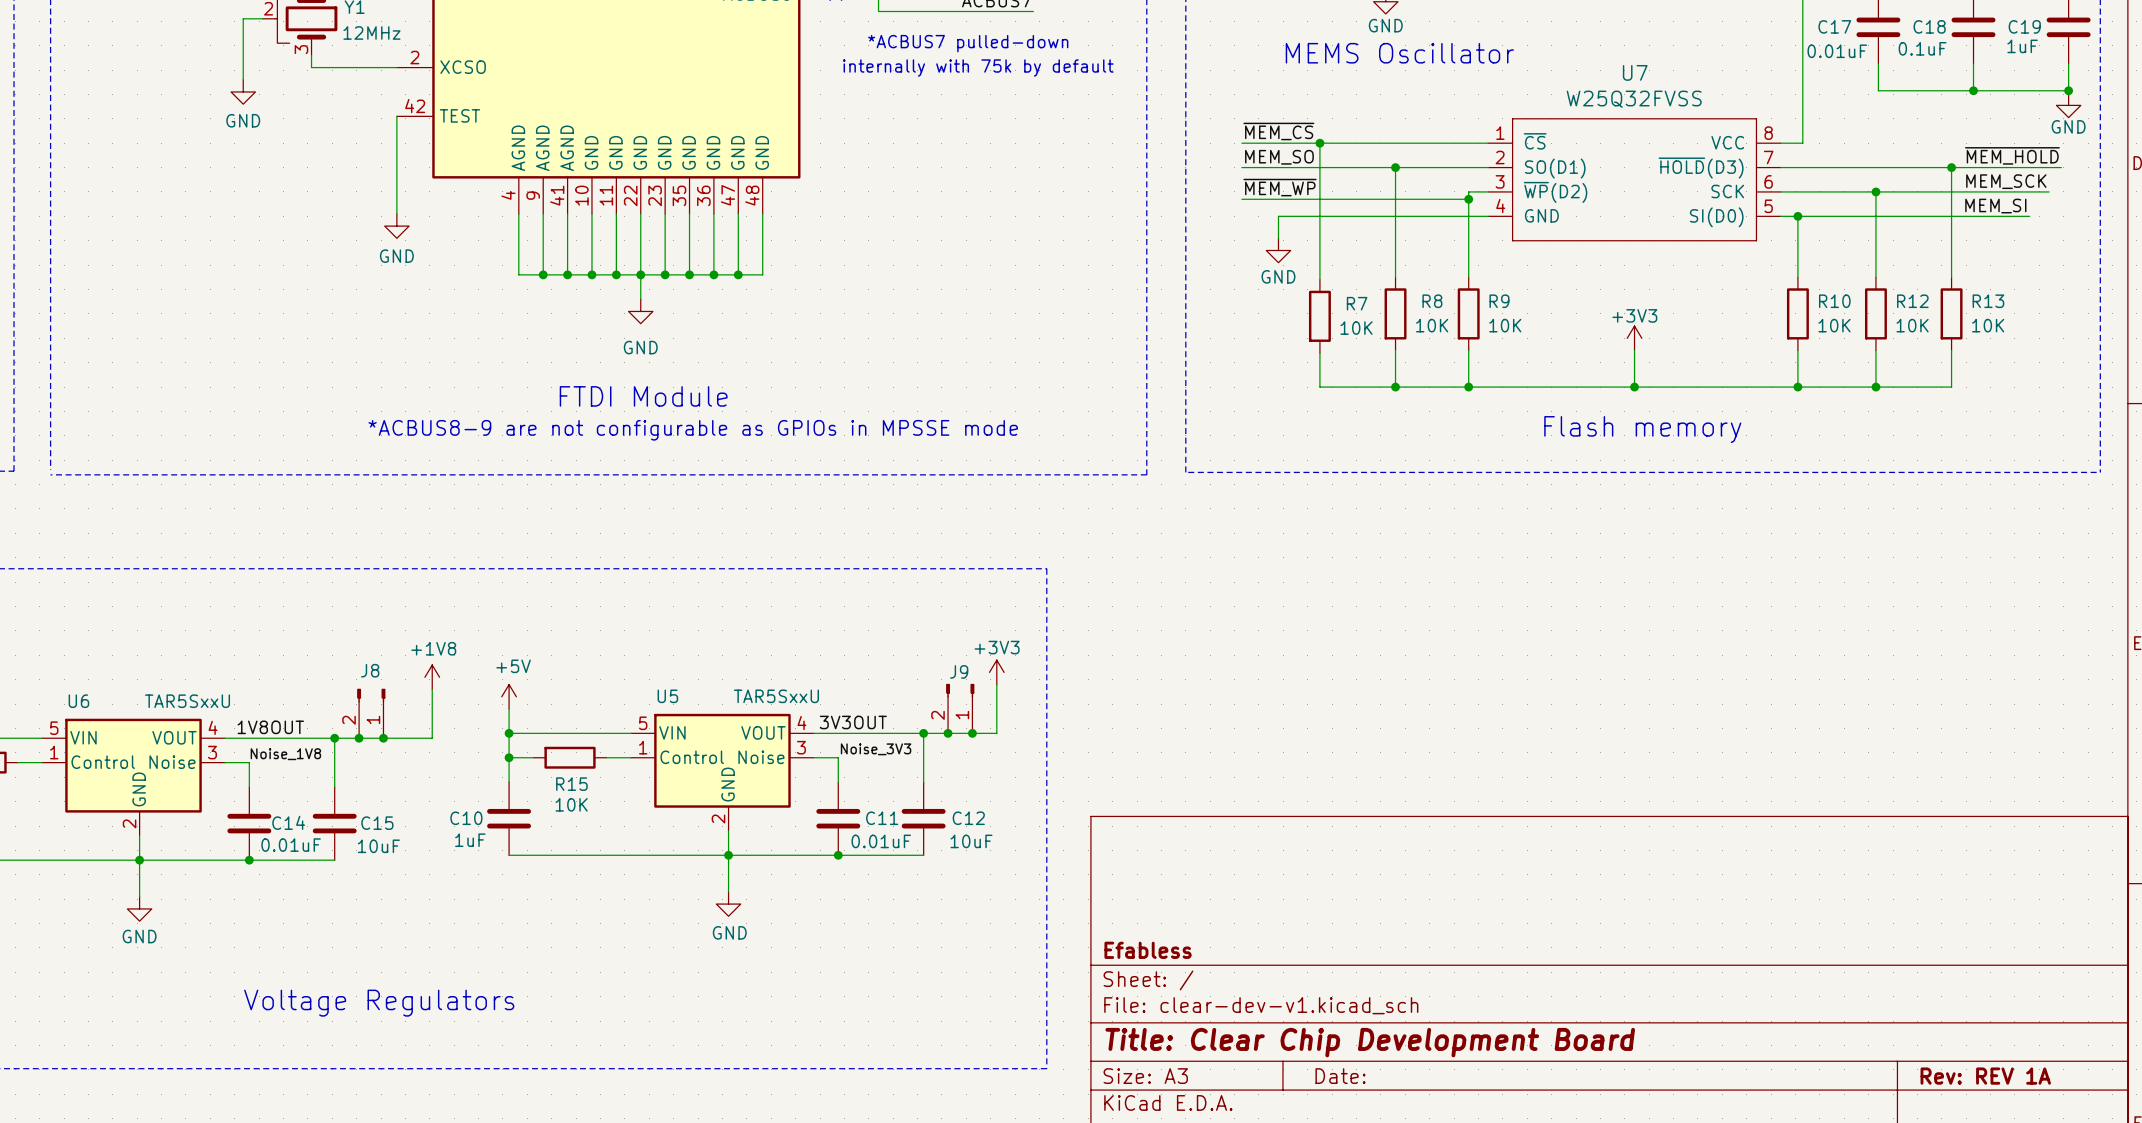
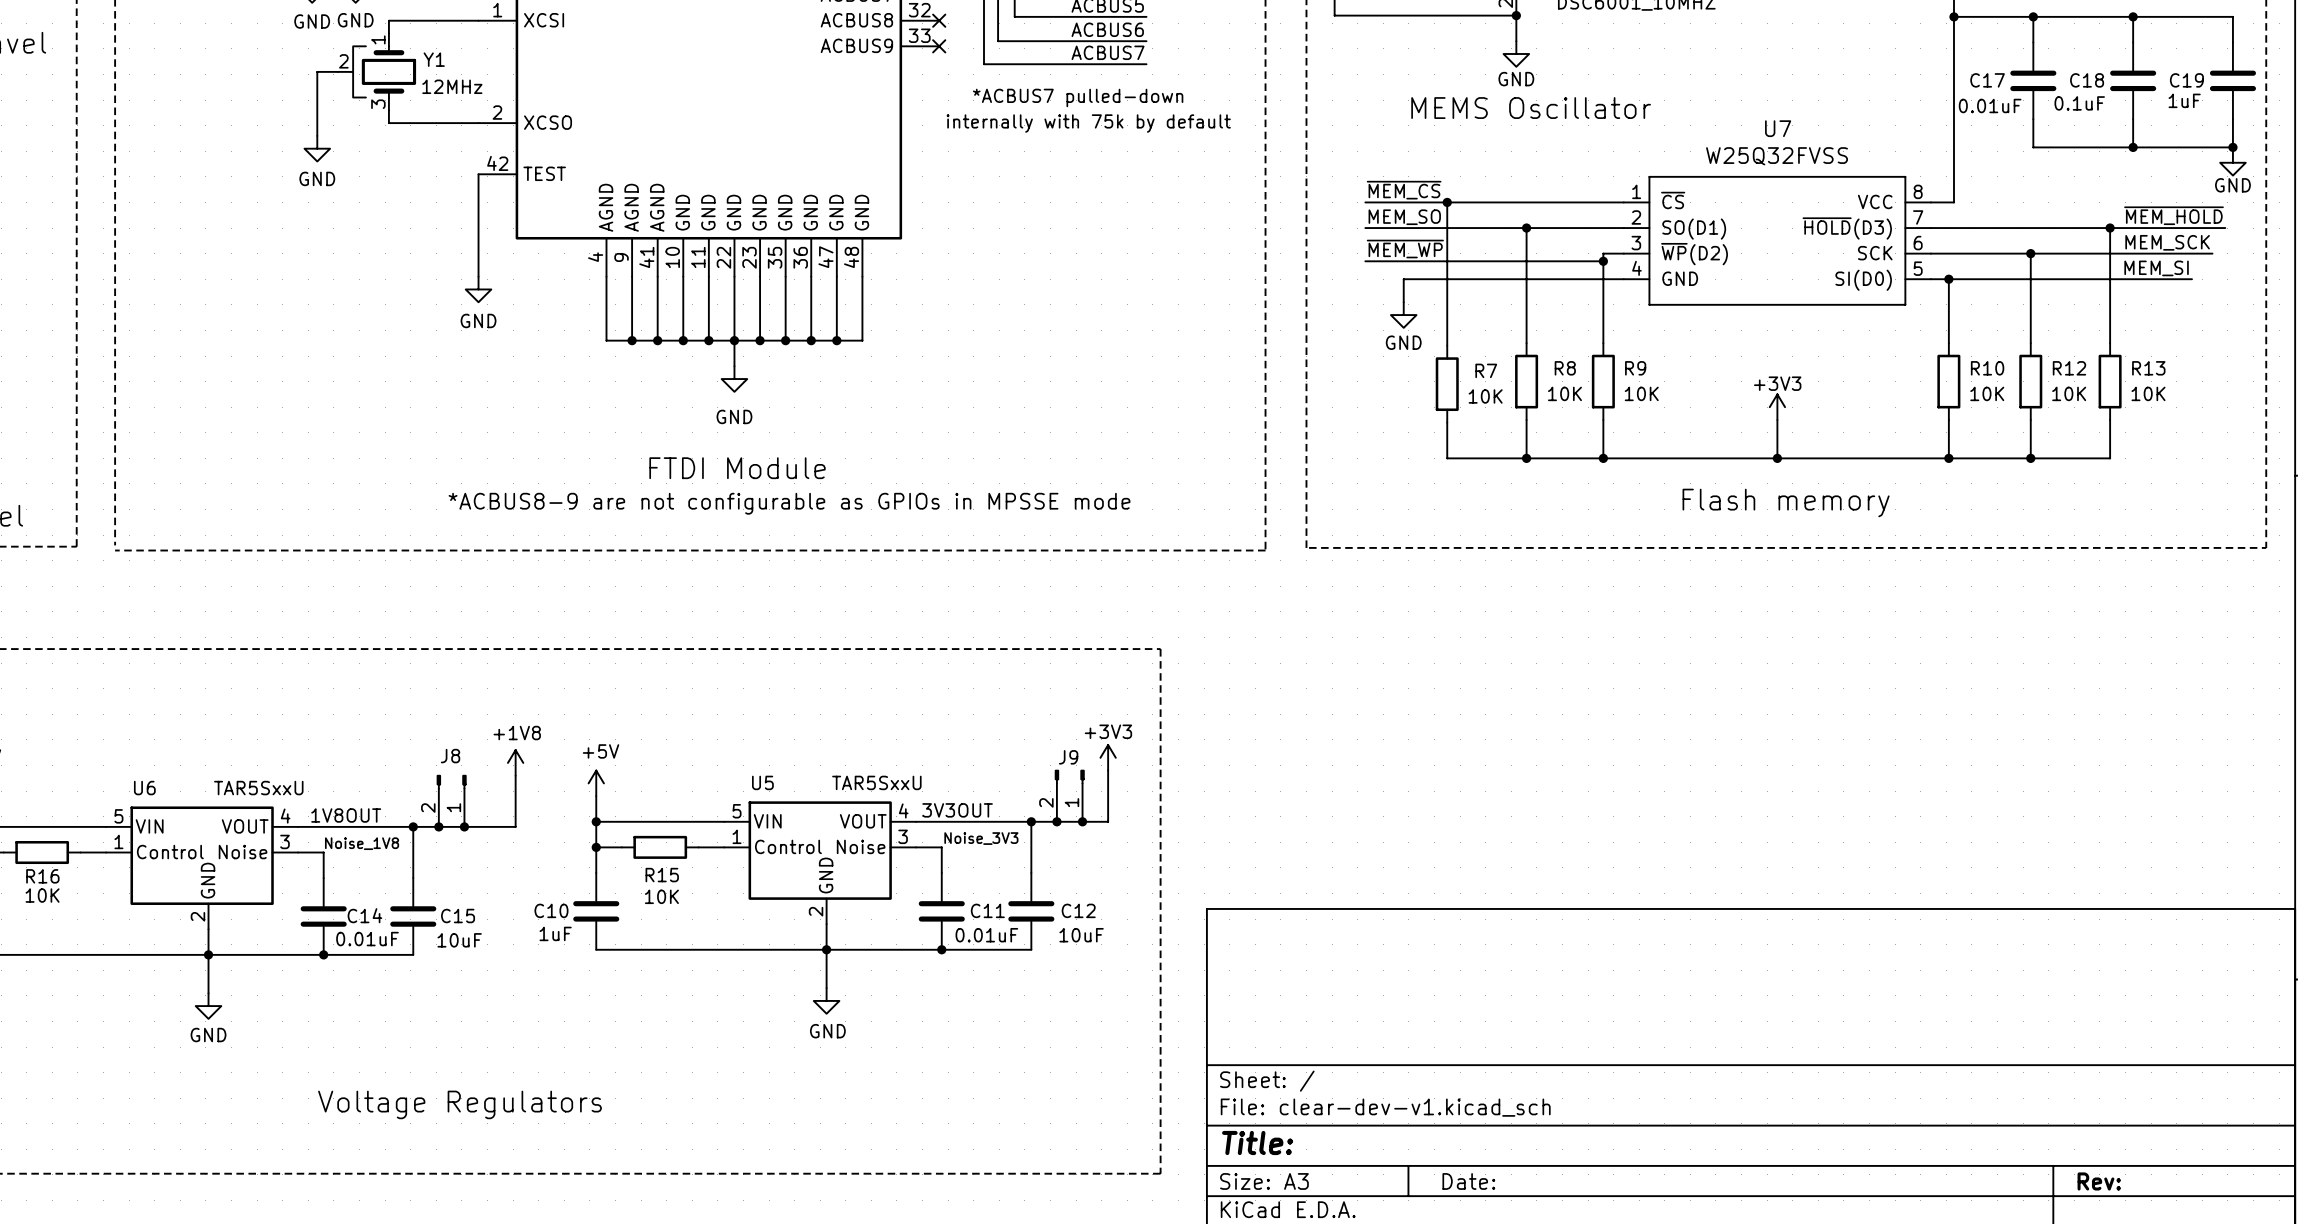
title block: Efabless (1148, 950) -> none
title block: Title: Clear Chip Development Board (1370, 1042) -> Title: (1257, 1143)
title block: Rev: REV 1A (1985, 1076) -> Rev: (2099, 1181)

